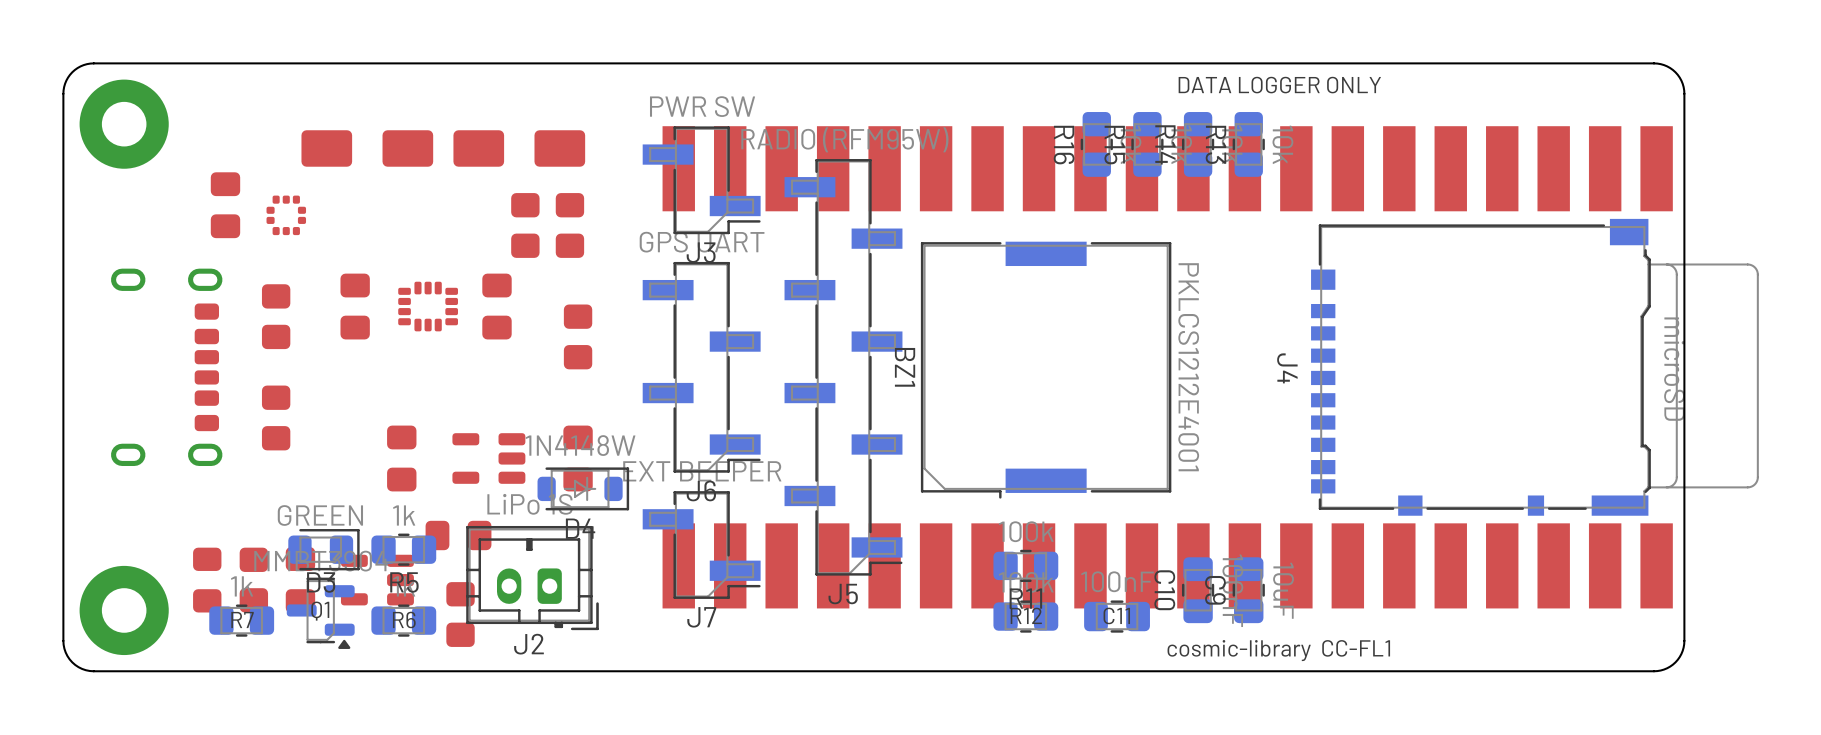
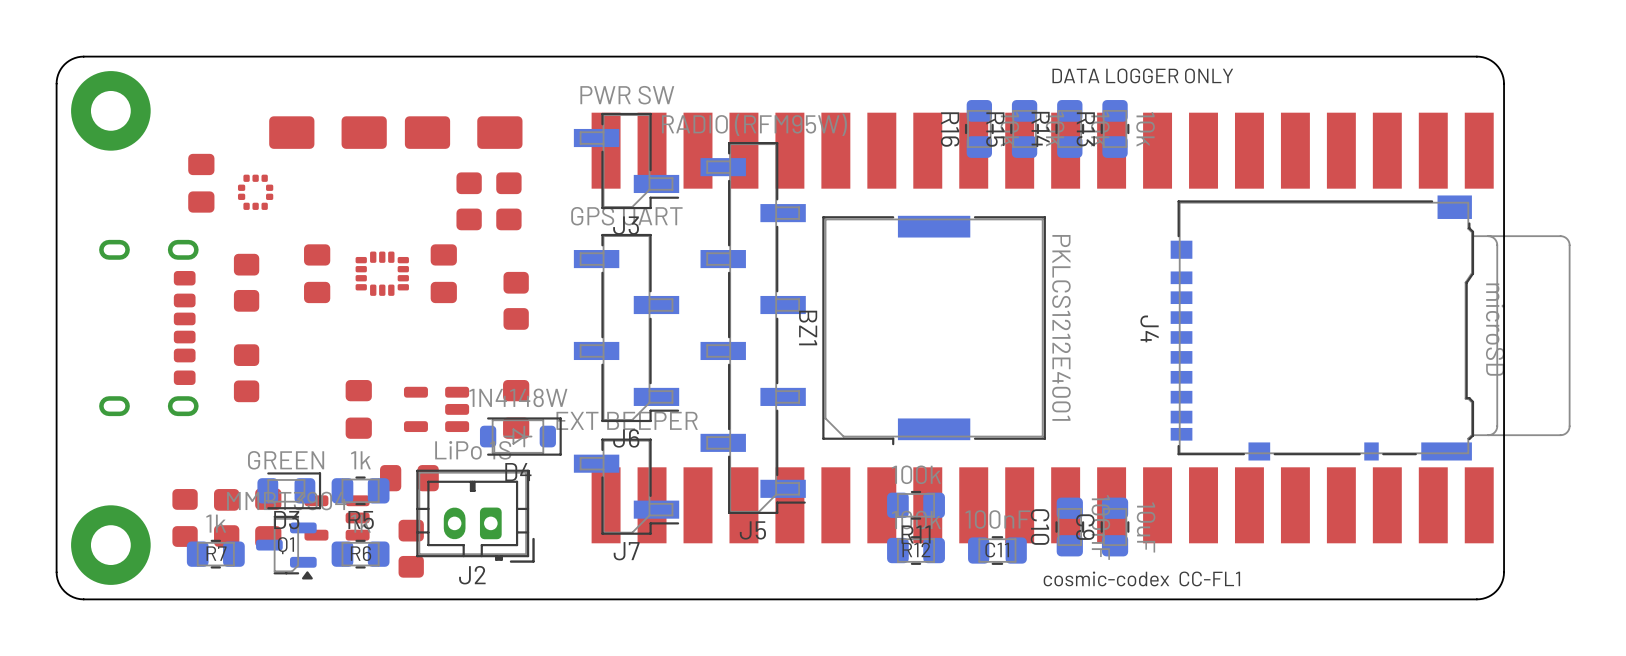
text: cosmic-library CC-FL1 (1278, 650) -> cosmic-codex CC-FL1 (1141, 578)

